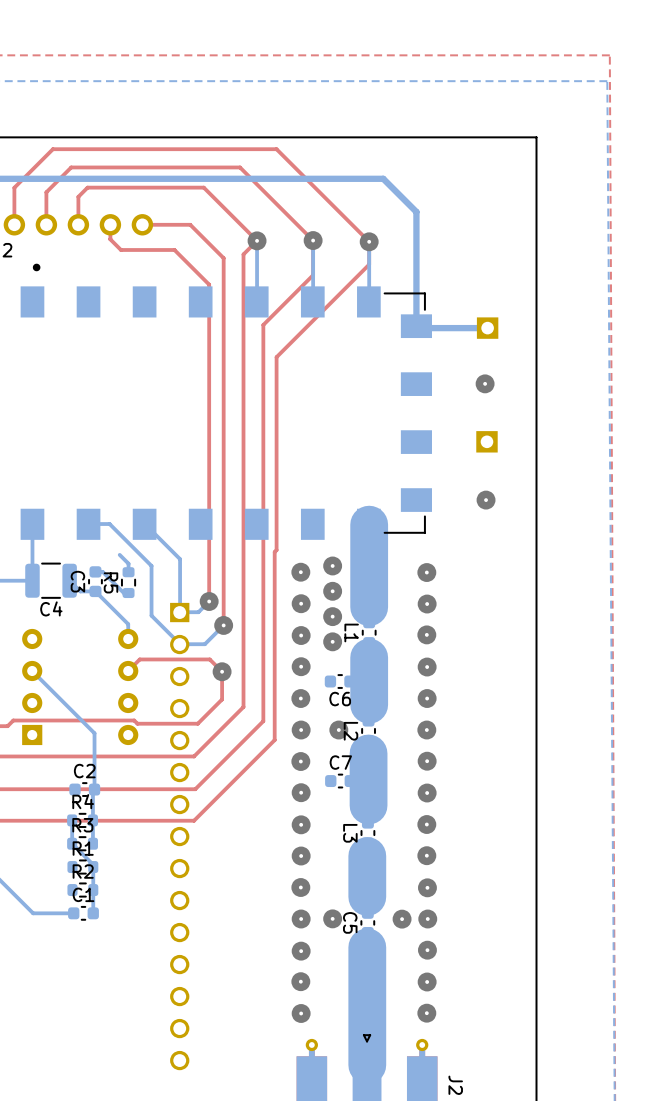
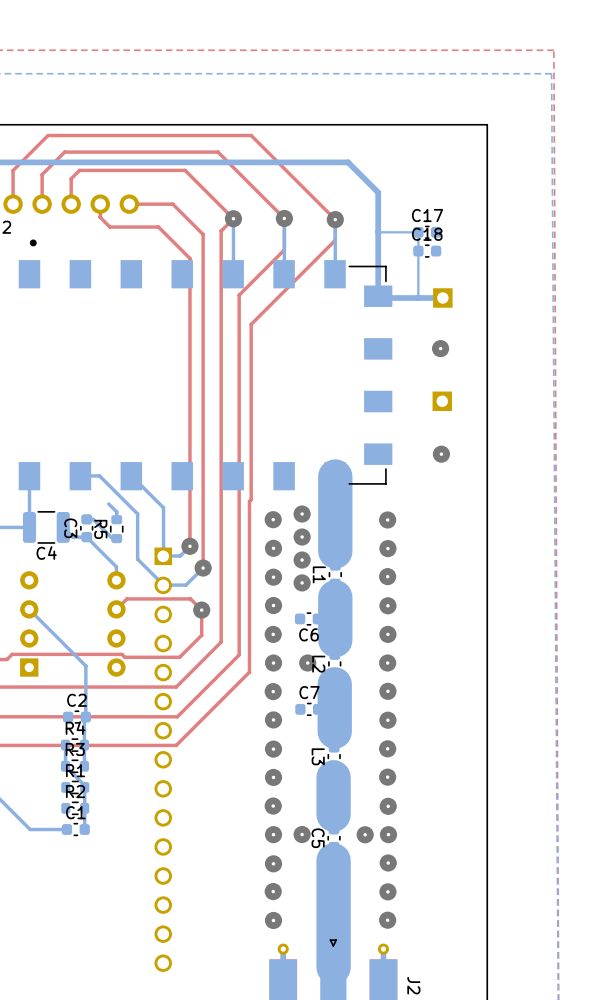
bottom track: none -> (378, 231) (418, 232) (417, 297)
C17: none -> (427, 232)
C18: none -> (427, 251)

